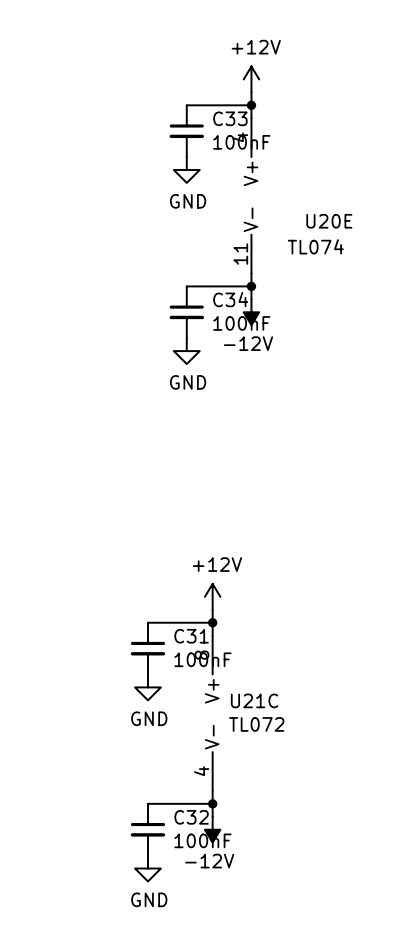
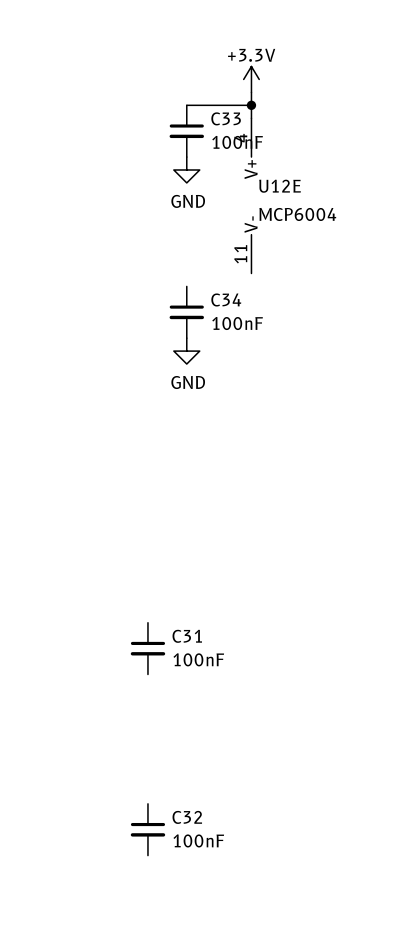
power symbol: +12V (251, 79) -> +3.3V (251, 79)
U20E name: U20E (329, 221) -> U12E (280, 186)
U20E value: TL074 (315, 246) -> MCP6004 (297, 214)
wire: (251, 273) (251, 299) -> none
wire: (186, 286) (251, 286) -> none
junction: (251, 286) -> none
power symbol: -12V (251, 312) -> none
power symbol: +12V (212, 596) -> none
wire: (212, 609) (212, 635) -> none
wire: (147, 622) (212, 622) -> none
junction: (212, 622) -> none
power symbol: GND (147, 687) -> none
U21C: TL072 (212, 713) -> none
wire: (212, 790) (212, 816) -> none
wire: (147, 803) (212, 803) -> none
junction: (212, 803) -> none
power symbol: -12V (212, 829) -> none
power symbol: GND (147, 868) -> none

